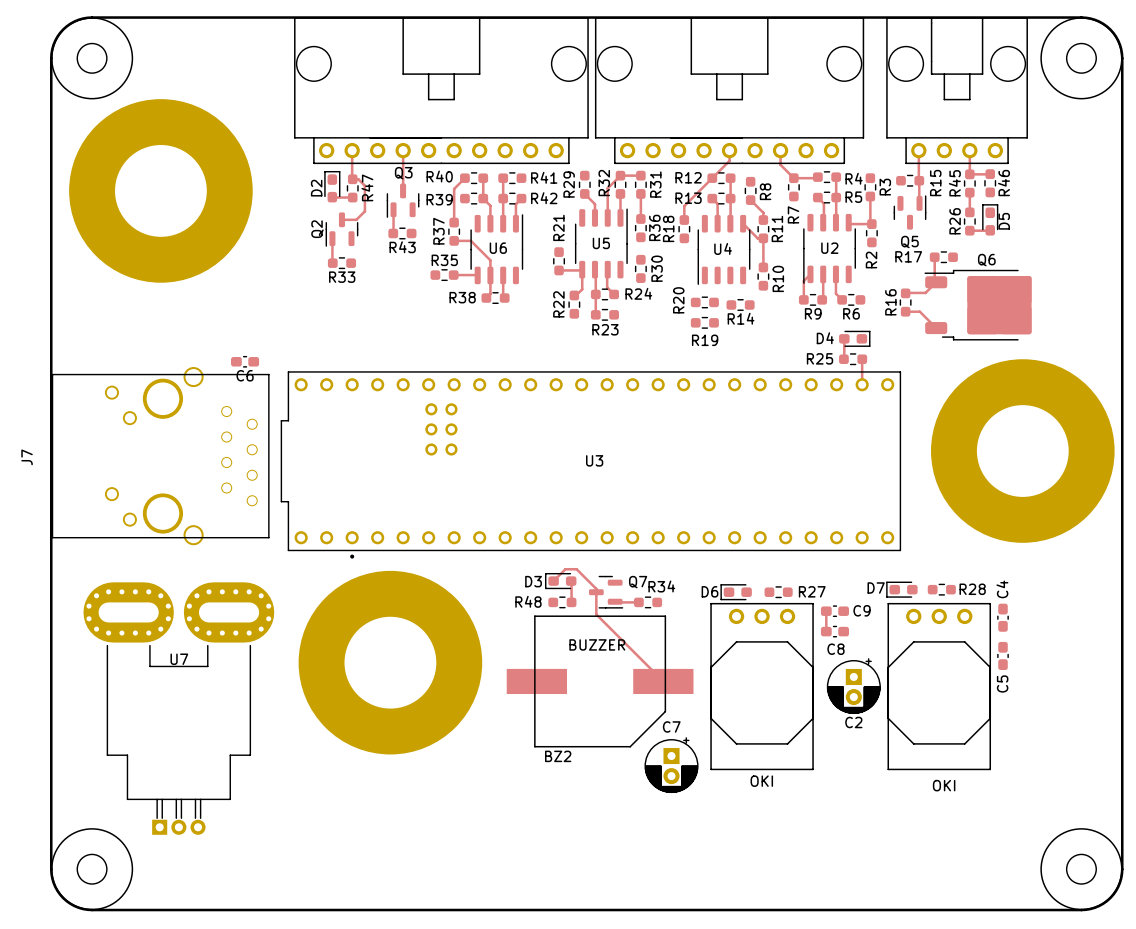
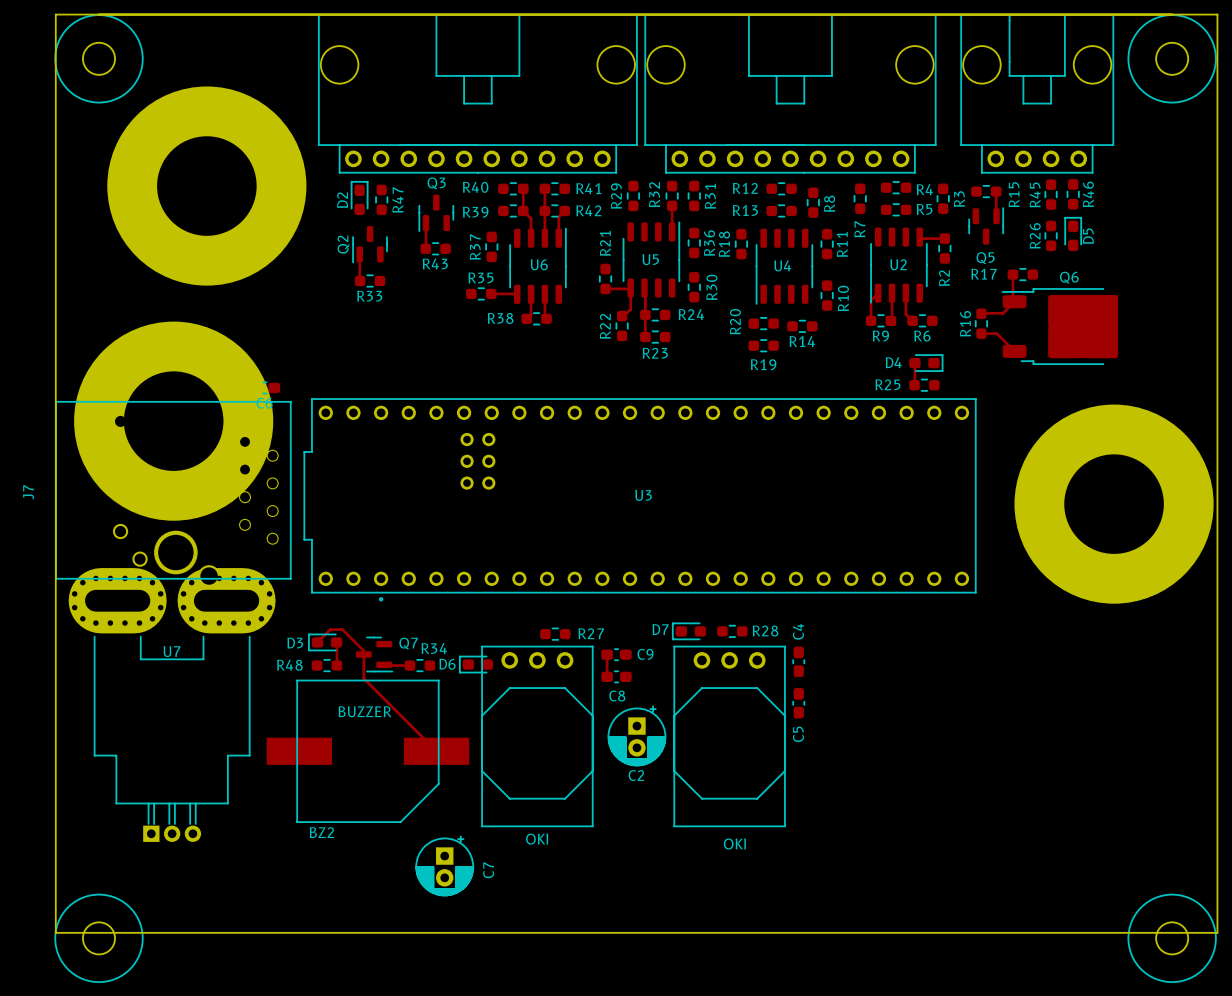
board edge: (92, 17) (74, 21) (63, 29) (53, 44) (51, 58) (51, 869) (55, 886) (63, 898) (78, 907) (92, 910) (1081, 910) (1094, 907) (1110, 898) (1119, 882) (1122, 869) (1122, 58) (1118, 40) (1110, 29) (1094, 19) (1081, 17) -> (98, 14) (55, 14) (55, 932) (1217, 932) (1217, 14) (1172, 14)
top track: (352, 150) (352, 178) (358, 179) (364, 185) (364, 211) (356, 219) (341, 219) -> none
top track: (403, 150) (403, 190) -> none
top track: (729, 150) (729, 160) (684, 206) (684, 220) -> none
top track: (780, 150) (780, 164) (793, 178) (817, 177) -> none
top track: (918, 150) (919, 180) -> none
top track: (969, 150) (969, 174) (990, 174) -> none
top track: (640, 175) (620, 175) (607, 188) (607, 217) -> none
top track: (836, 177) (835, 222) -> none
top track: (464, 178) (454, 188) (454, 222) -> none
top track: (730, 178) (730, 223) -> none
part position: (160, 190) -> (206, 186)
top track: (969, 192) (969, 212) -> none
top track: (584, 193) (594, 204) (594, 217) -> none
top track: (640, 193) (640, 218) -> none
top track: (870, 196) (871, 224) -> none
top track: (332, 197) (352, 197) -> none
top track: (817, 197) (823, 203) (823, 222) -> none
top track: (712, 198) (717, 203) (717, 223) -> none
top track: (750, 200) (763, 212) (763, 220) -> none
top track: (743, 223) (757, 238) (763, 238) (763, 267) -> none
top track: (990, 230) (969, 230) -> none
top track: (454, 240) (470, 240) (490, 260) (490, 275) -> none
top track: (607, 269) (607, 287) (614, 294) -> none
top track: (862, 359) (862, 384) -> none
part: none -> (173, 421)
part position: (1022, 451) -> (1114, 504)
top track: (553, 581) (565, 569) (576, 569) (596, 588) (596, 614) (663, 681) -> none
D3 position: (560, 581) -> (325, 642)
top track: (571, 581) (571, 602) -> none
D7 position: (901, 589) -> (689, 631)
R28 position: (941, 589) -> (732, 631)
Q7 position: (606, 592) -> (374, 654)
D6 position: (736, 592) -> (476, 664)
R27 position: (778, 592) -> (555, 634)
top track: none -> (317, 642) (330, 629) (342, 629) (363, 650) (363, 678) (436, 751)
top track: none -> (336, 642) (336, 665)
top track: (615, 601) (638, 602) -> none
R48 position: (562, 602) -> (327, 665)
R34 position: (648, 602) -> (419, 665)
top track: none -> (607, 654) (607, 676)
top track: (826, 611) (826, 631) -> none
C9 position: (834, 611) -> (616, 654)
top track: none -> (384, 664) (410, 665)
C4 position: (1003, 617) -> (798, 661)
C8 position: (834, 631) -> (616, 676)
C5 position: (1003, 655) -> (798, 703)
part: (390, 662) -> none
BZ2 position: (600, 681) -> (367, 751)
part: none -> OKI (537, 736)
part position: (762, 686) -> (729, 736)
C2 position: (853, 686) -> (636, 735)
part: OKI (939, 686) -> none
U7 position: (178, 708) -> (172, 705)
C7 name rotation: 0° (671, 726) -> 90° counterclockwise (488, 870)
C7 name position: C7 (671, 726) -> C7 (488, 870)
C7 position: (671, 765) -> (444, 865)
part value position: OKI (761, 781) -> OKI (734, 843)

